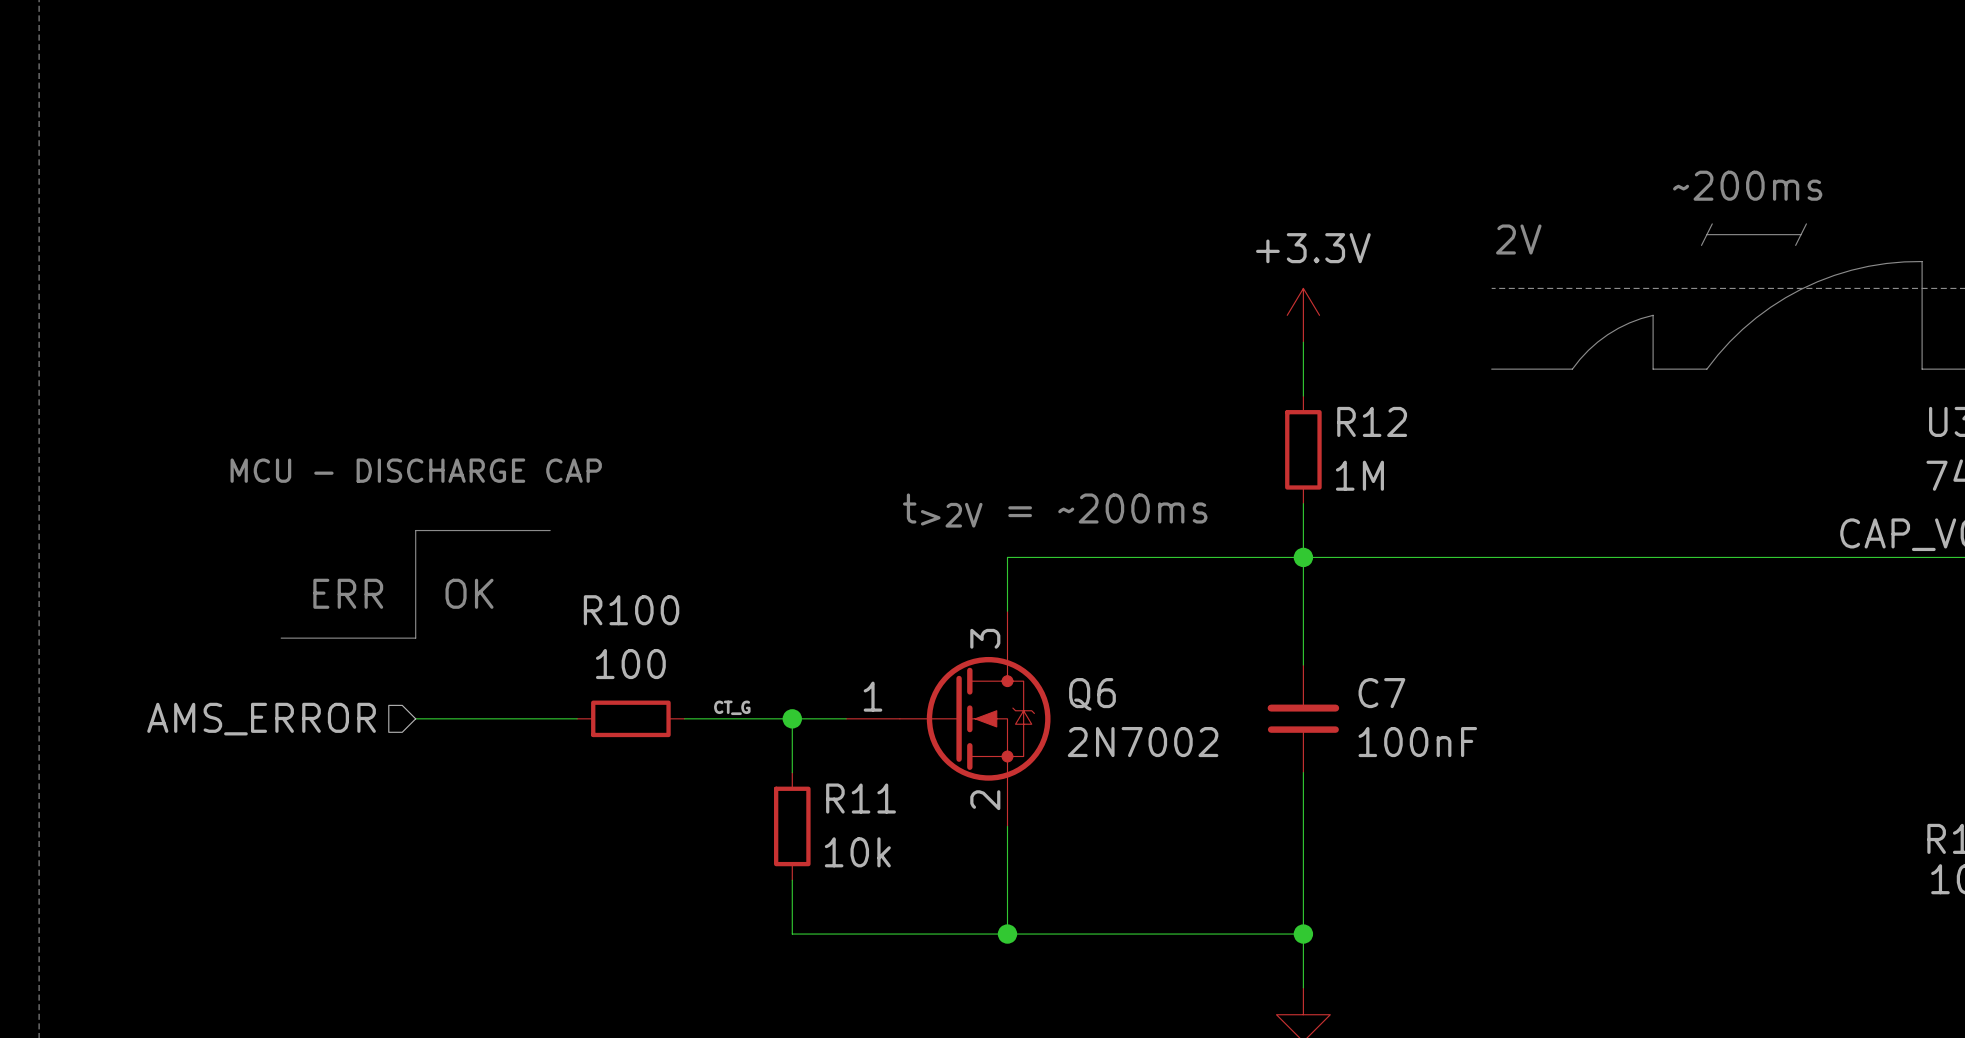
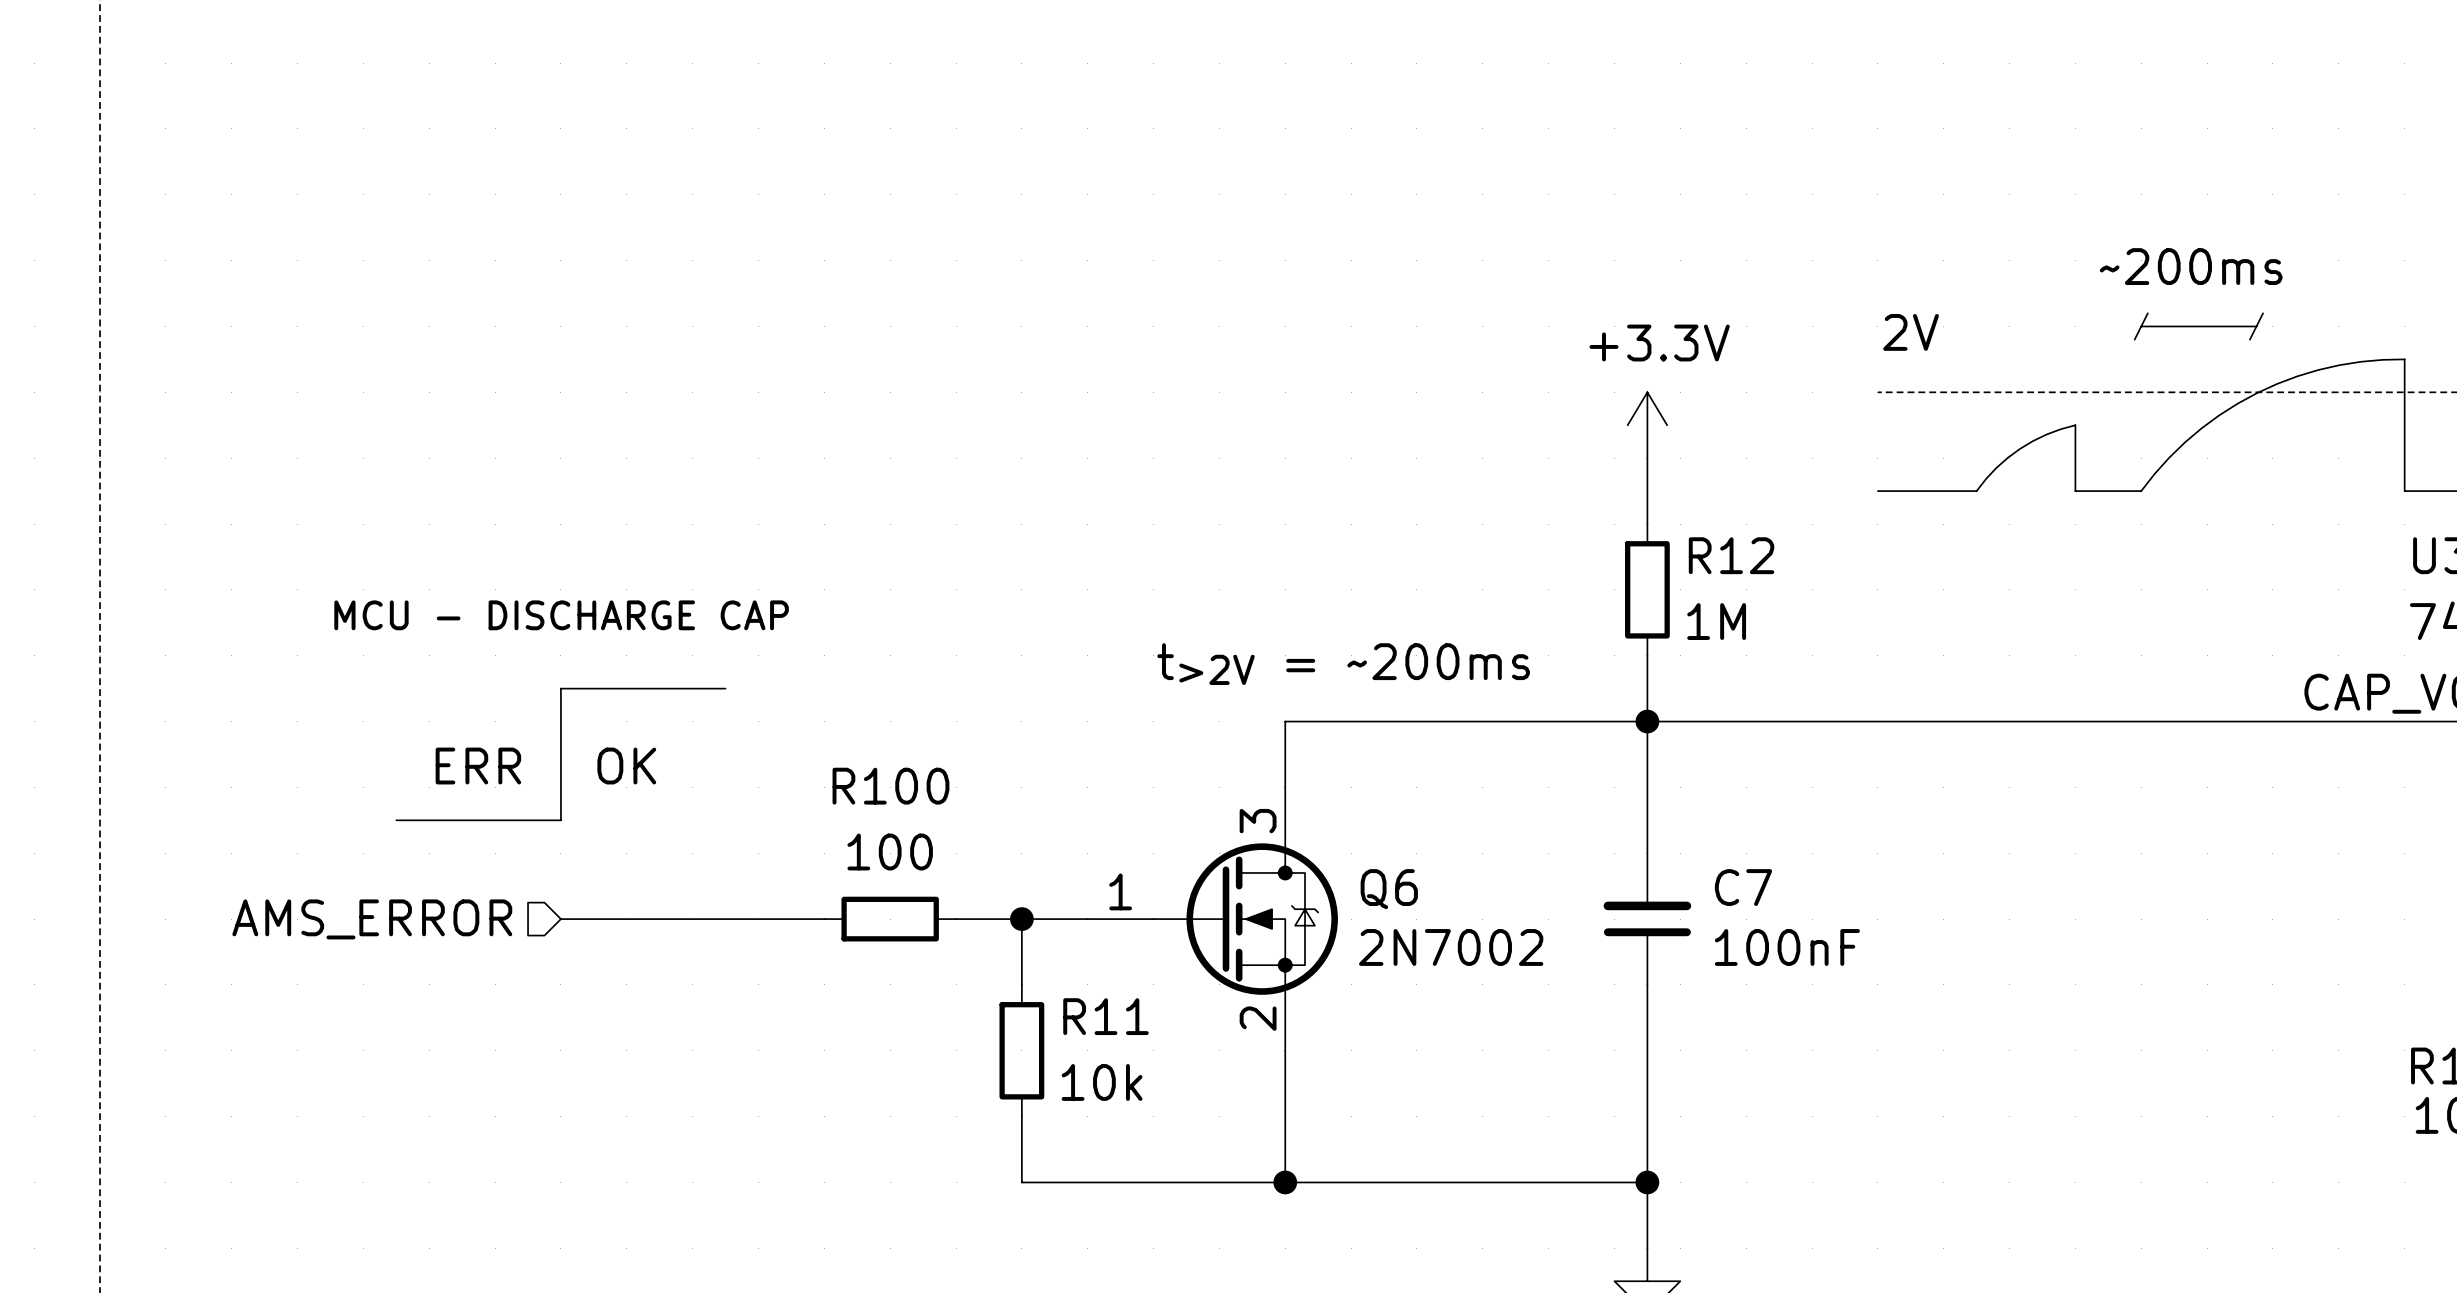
label: CT_G (732, 707) -> none
R100 position: (630, 718) -> (890, 919)
wire: (684, 718) (738, 718) -> (758, 919) (824, 919)

